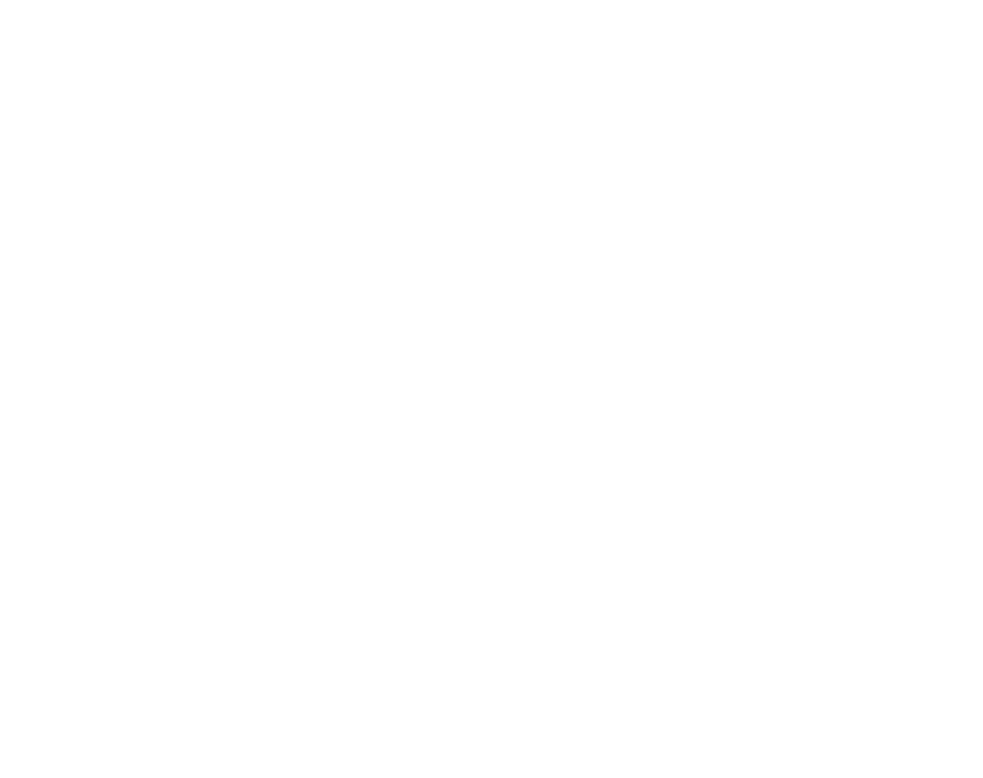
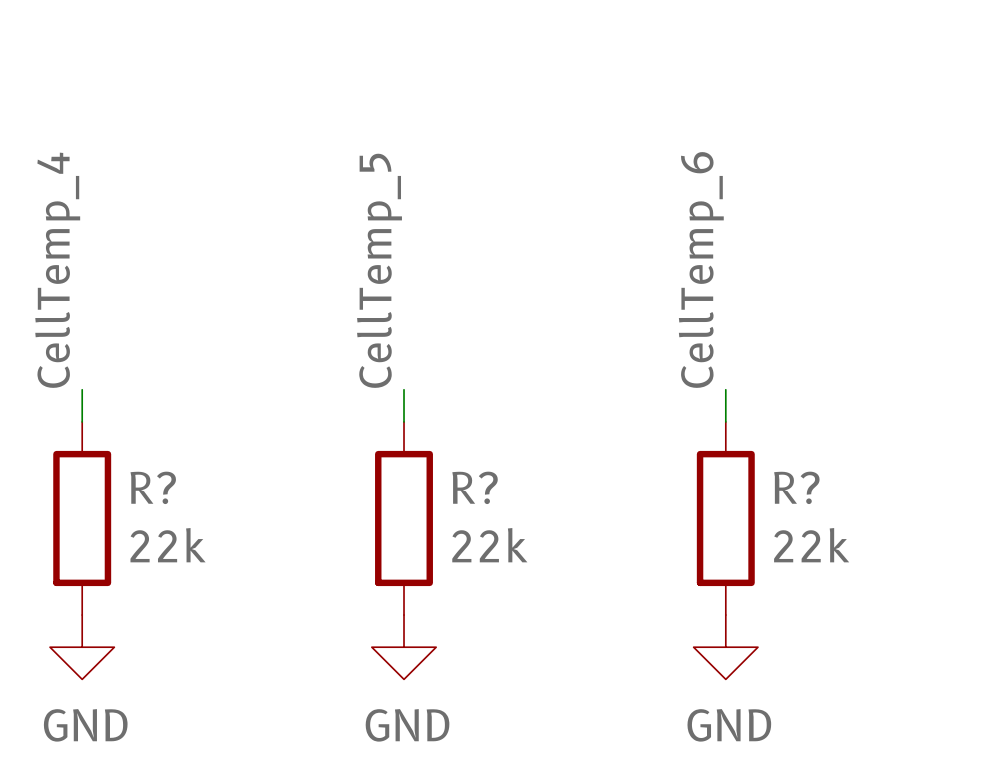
label: none -> CellTemp_6 (701, 269)
label: none -> CellTemp_4 (57, 270)
label: none -> CellTemp_5 (379, 270)
wire: none -> (82, 389) (82, 421)
wire: none -> (404, 389) (404, 421)
wire: none -> (725, 389) (725, 421)
R?: none -> 22k (82, 518)
R?: none -> 22k (404, 518)
R?: none -> 22k (725, 518)
power symbol: none -> GND (82, 647)
power symbol: none -> GND (404, 647)
power symbol: none -> GND (725, 647)

